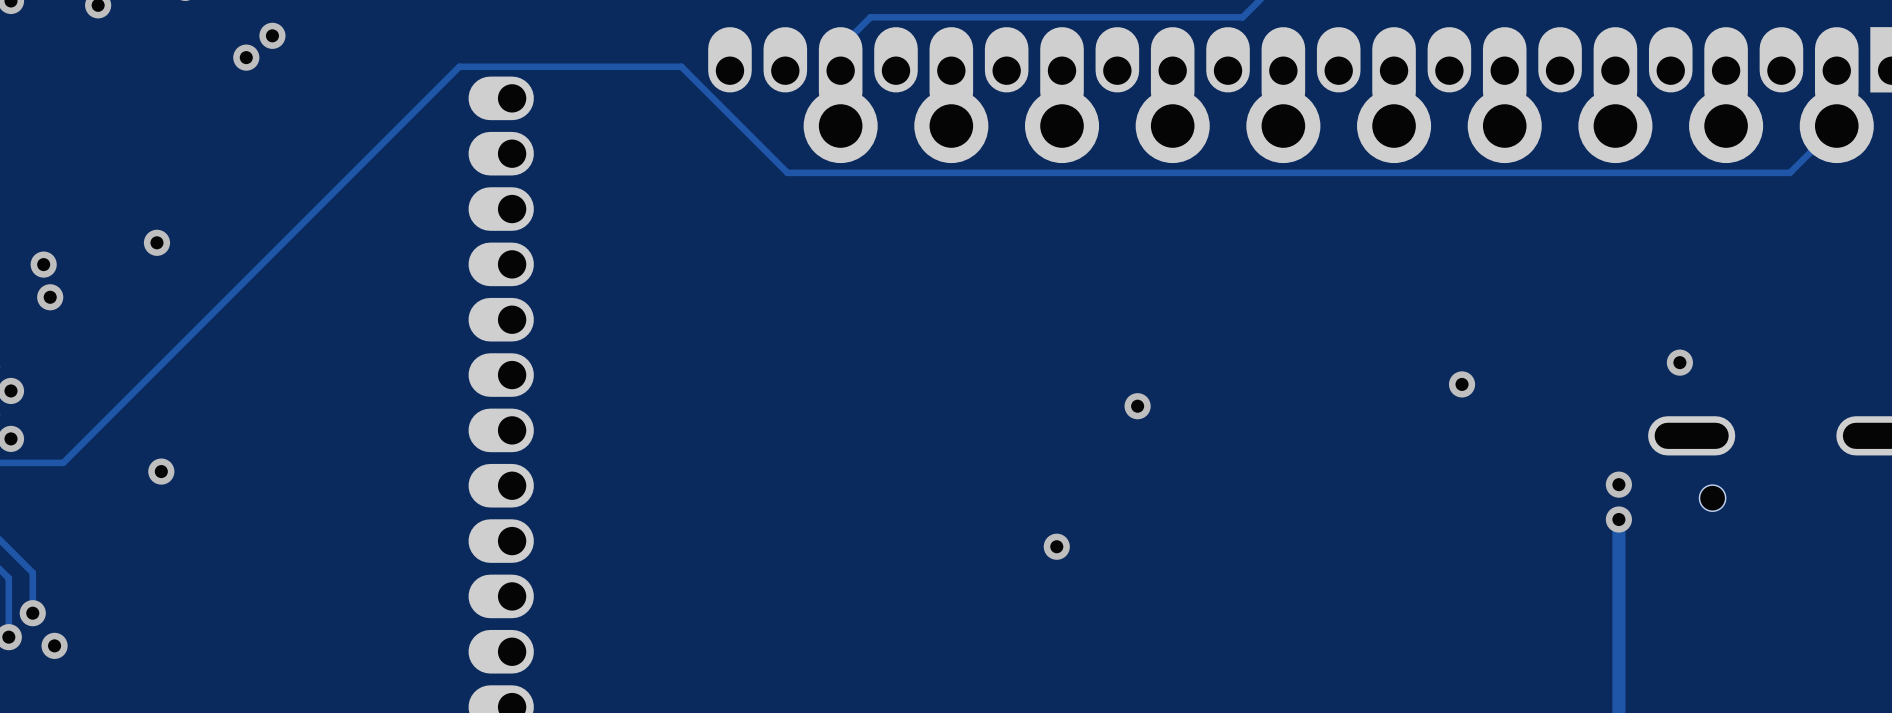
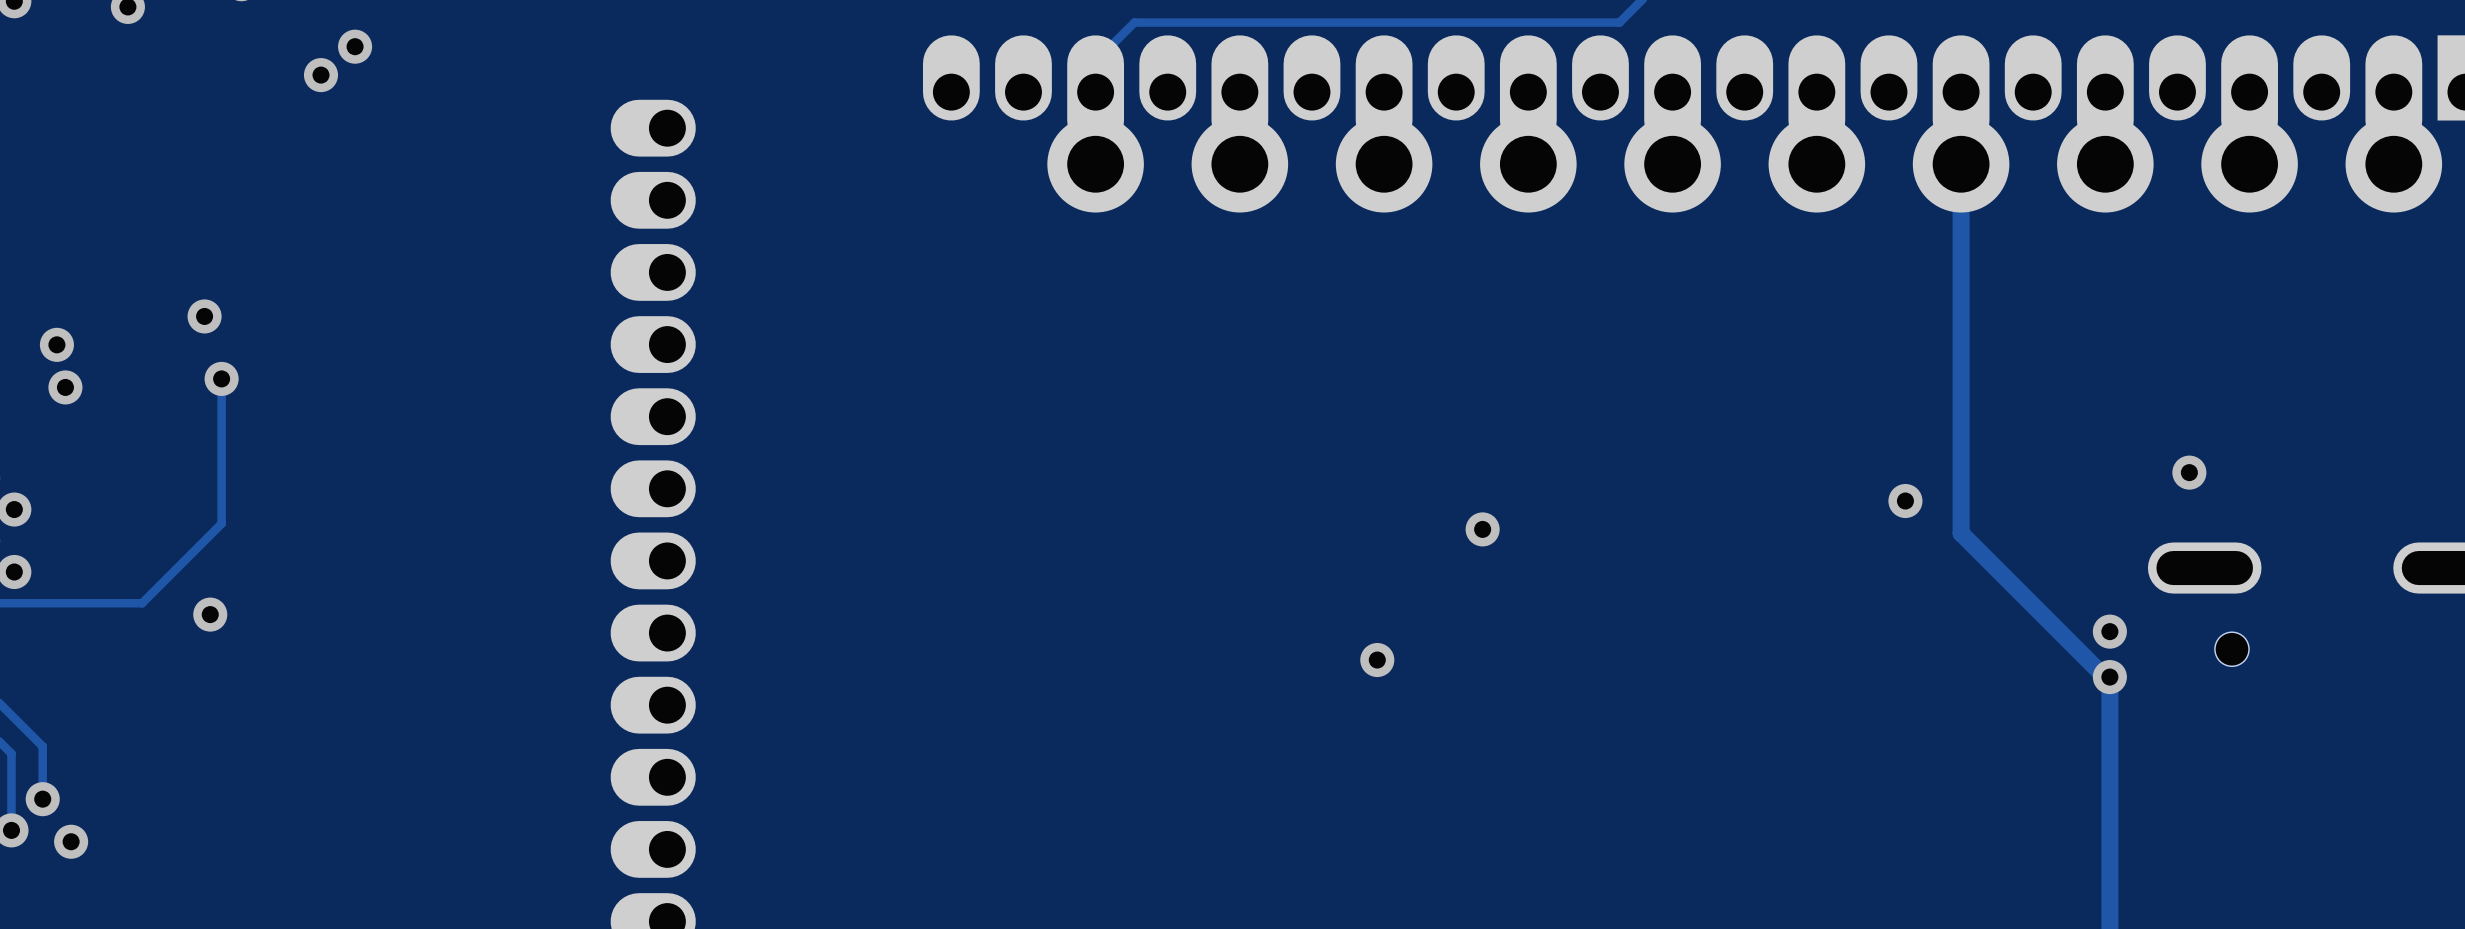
track: none -> (1961, 164) (1961, 533) (2104, 677) (2109, 677)
track: (1836, 126) (1789, 172) (787, 172) (681, 66) (459, 66) (63, 462) -> (221, 378) (221, 523) (142, 603) (82, 603)
via: none -> (221, 378)
via position: (1056, 546) -> (1377, 660)

